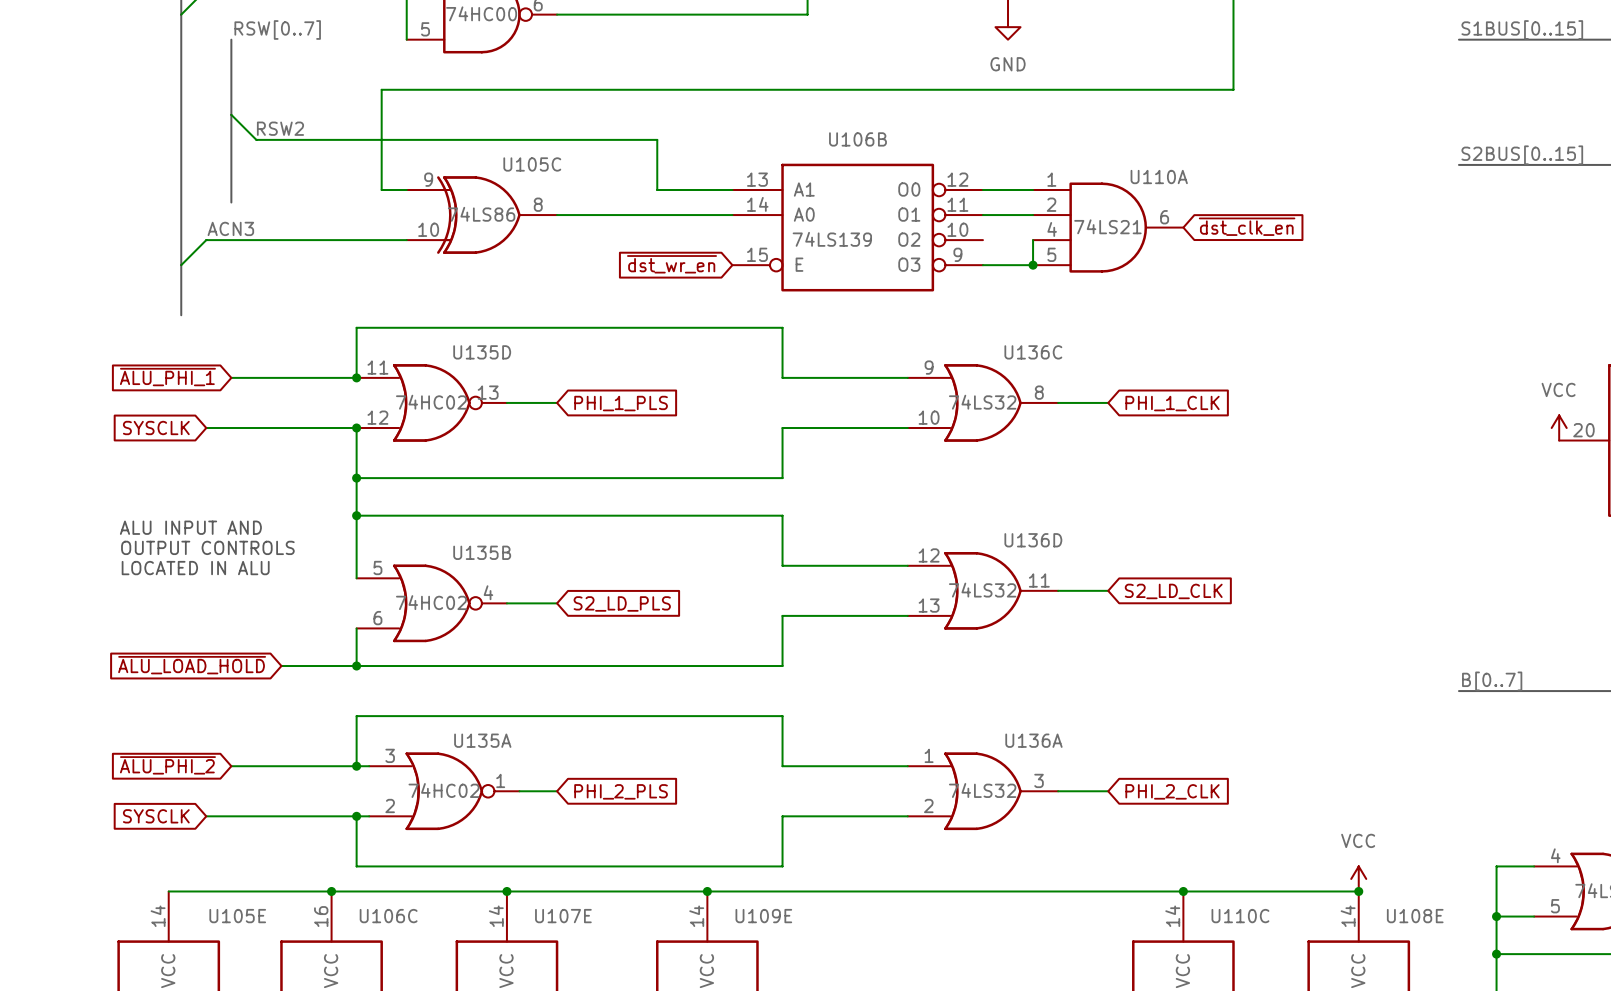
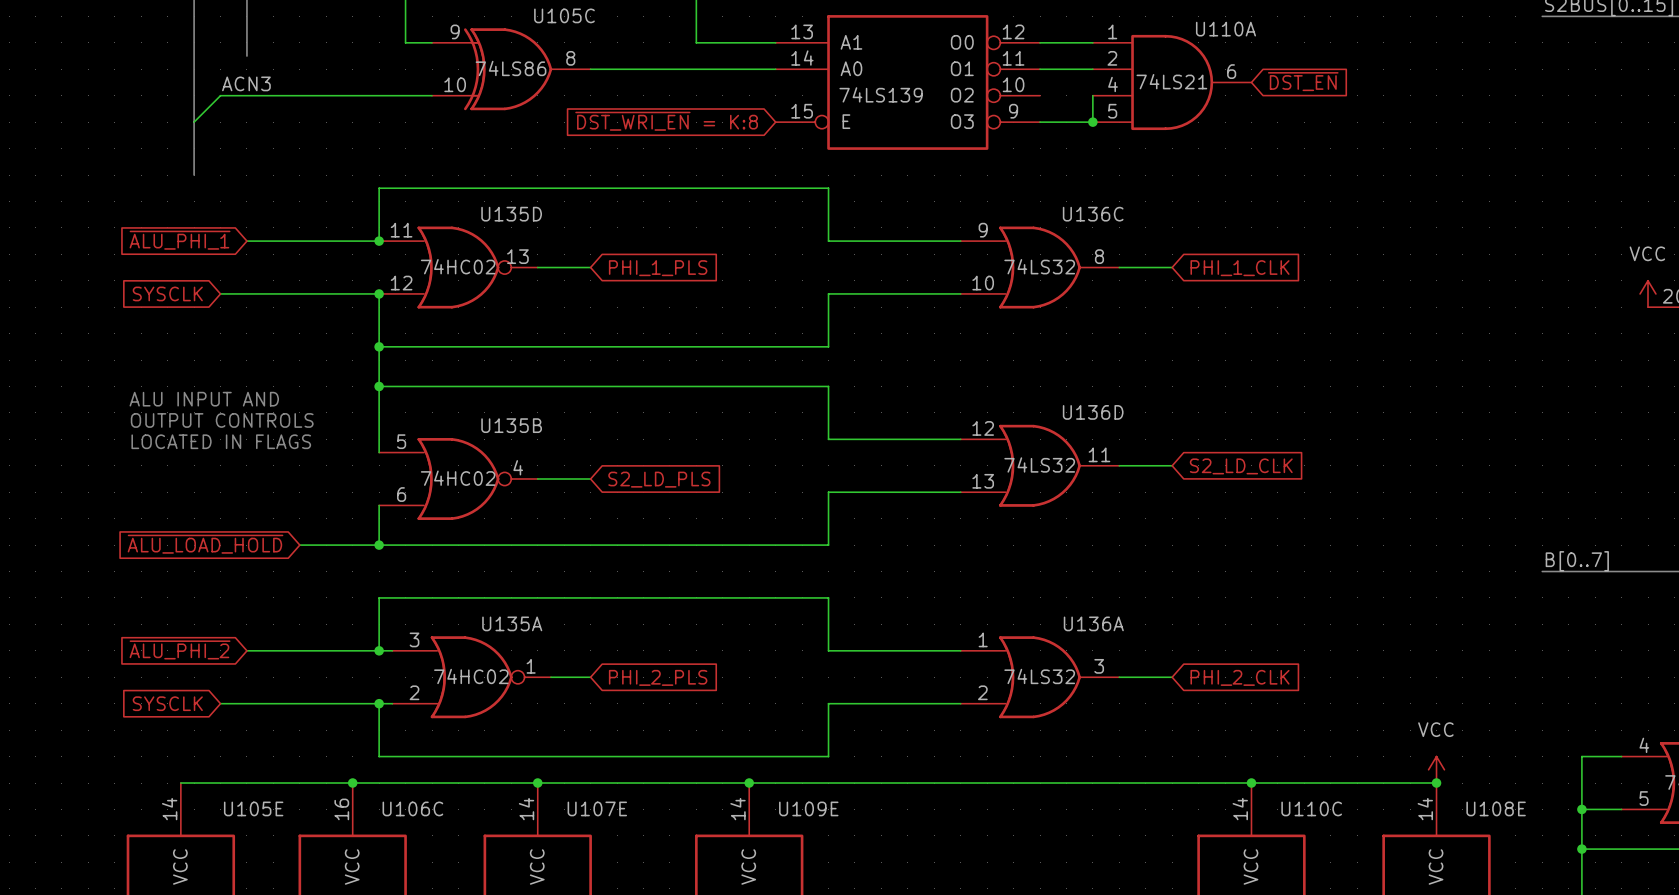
global label: ~{dst_clk_en} (1247, 226) -> ~{DST_EN} (1303, 81)
global label: ~{dst_wr_en} (672, 264) -> ~{DST_WRI_EN} = K:8 (666, 121)
text: LOCATED IN ALU (195, 568) -> LOCATED IN FLAGS (221, 441)

